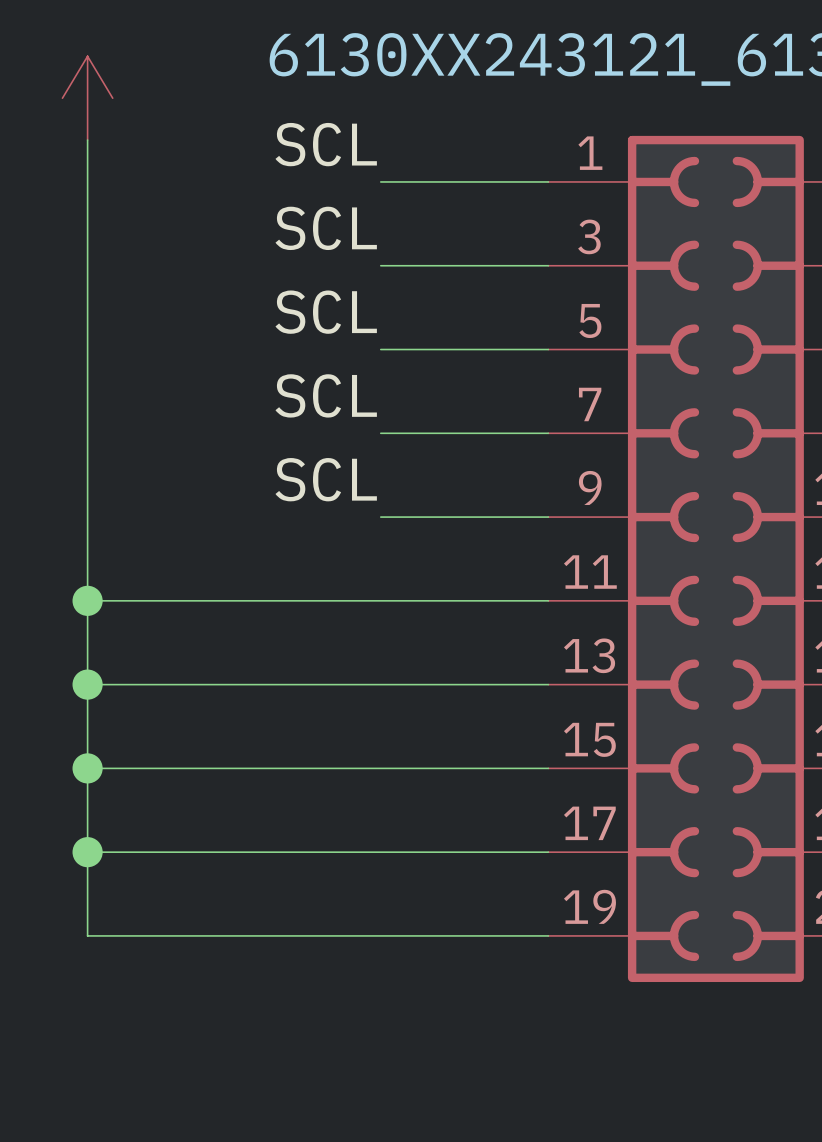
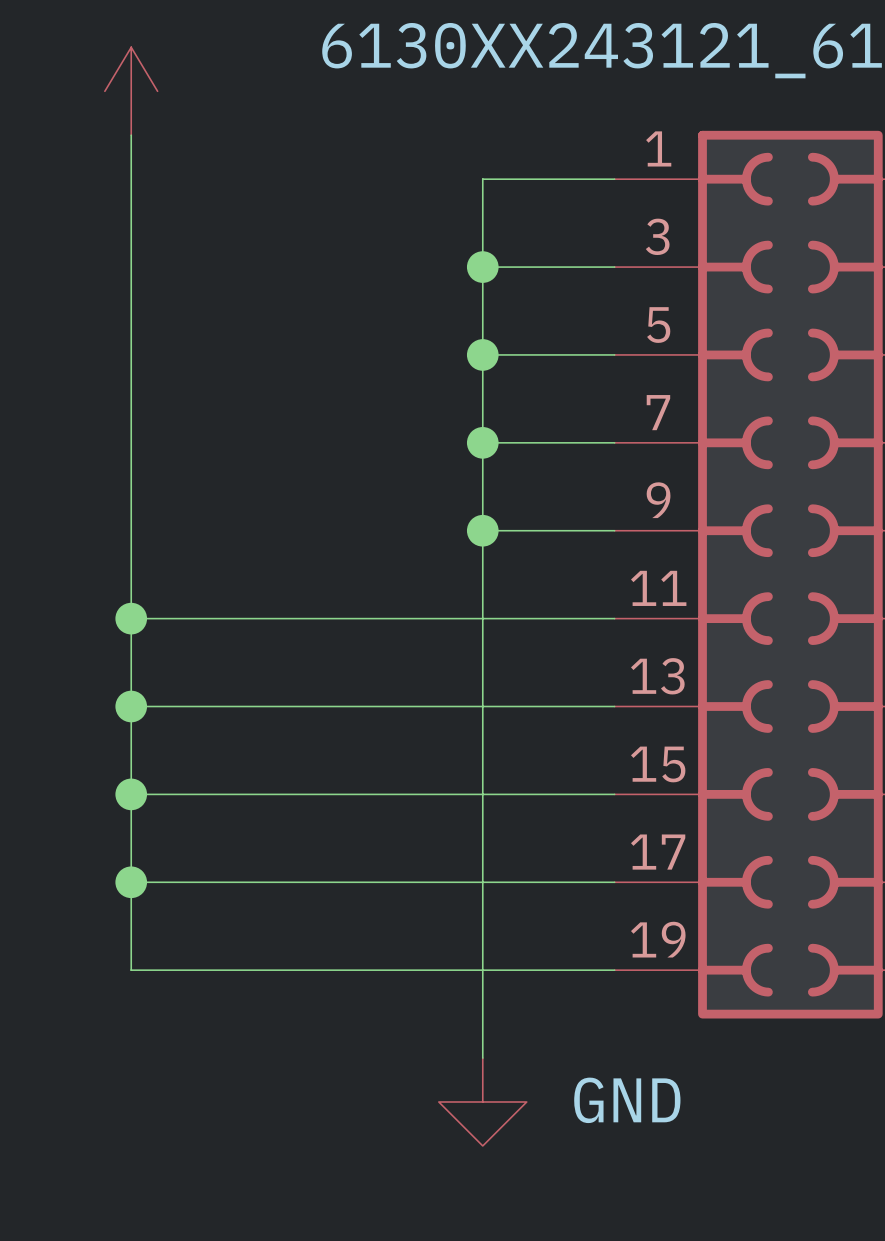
label: SCL (326, 144) -> none
wire: (380, 181) (422, 181) -> (482, 1058) (482, 179)
label: SCL (326, 228) -> none
wire: (380, 265) (422, 265) -> none
junction: none -> (482, 267)
label: SCL (326, 312) -> none
wire: (380, 349) (422, 349) -> none
junction: none -> (482, 354)
label: SCL (326, 395) -> none
wire: (380, 433) (422, 433) -> none
junction: none -> (482, 442)
label: SCL (326, 479) -> none
wire: (380, 517) (422, 517) -> none
junction: none -> (482, 530)
power symbol: none -> GND (482, 1101)

